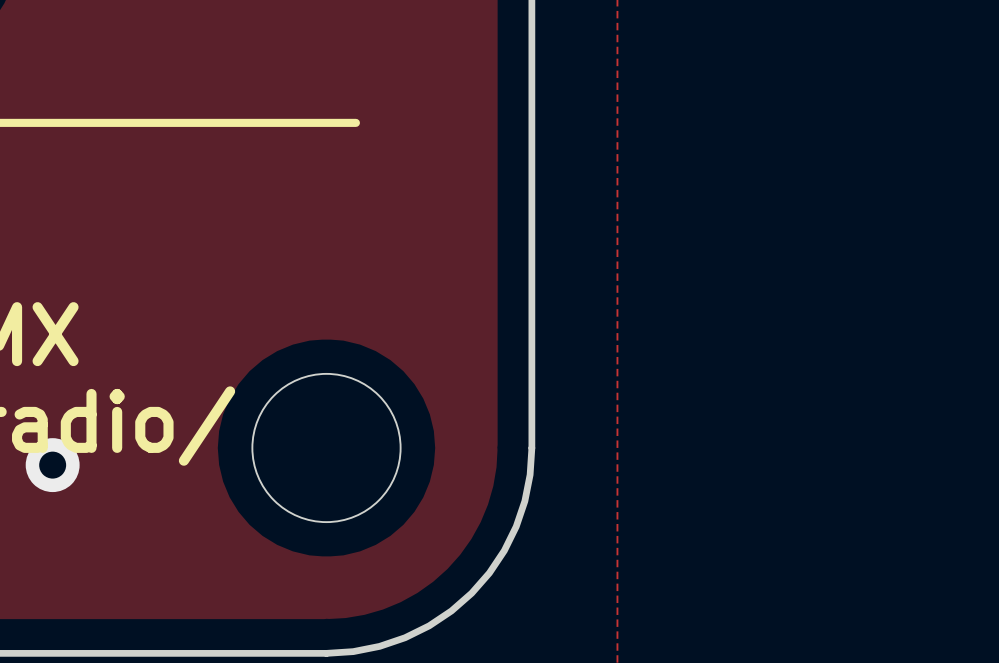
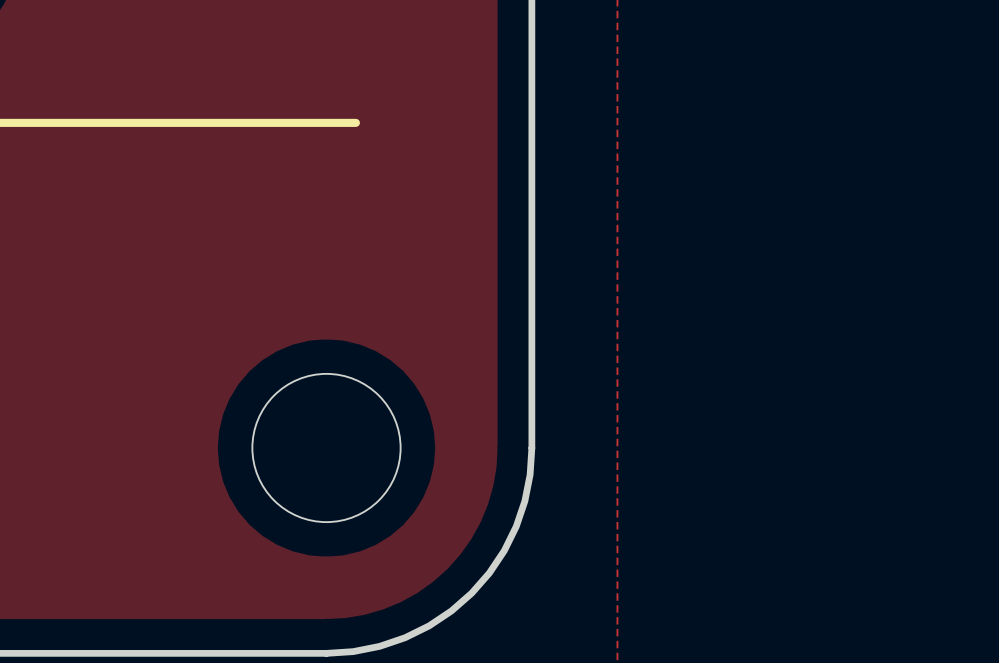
via: (52, 465) -> none

